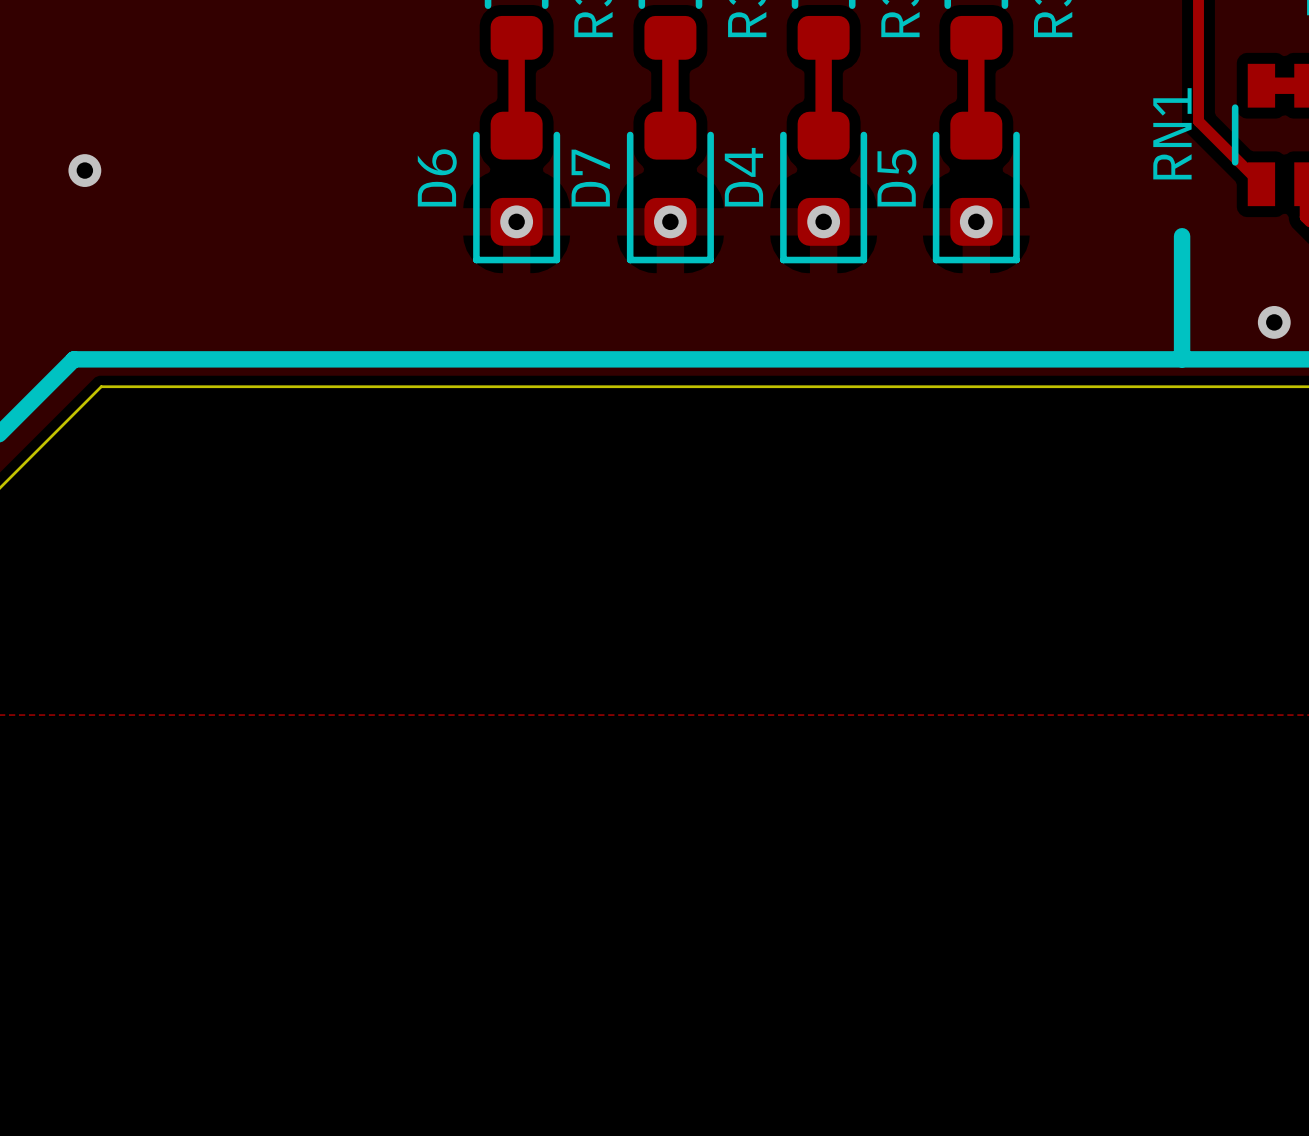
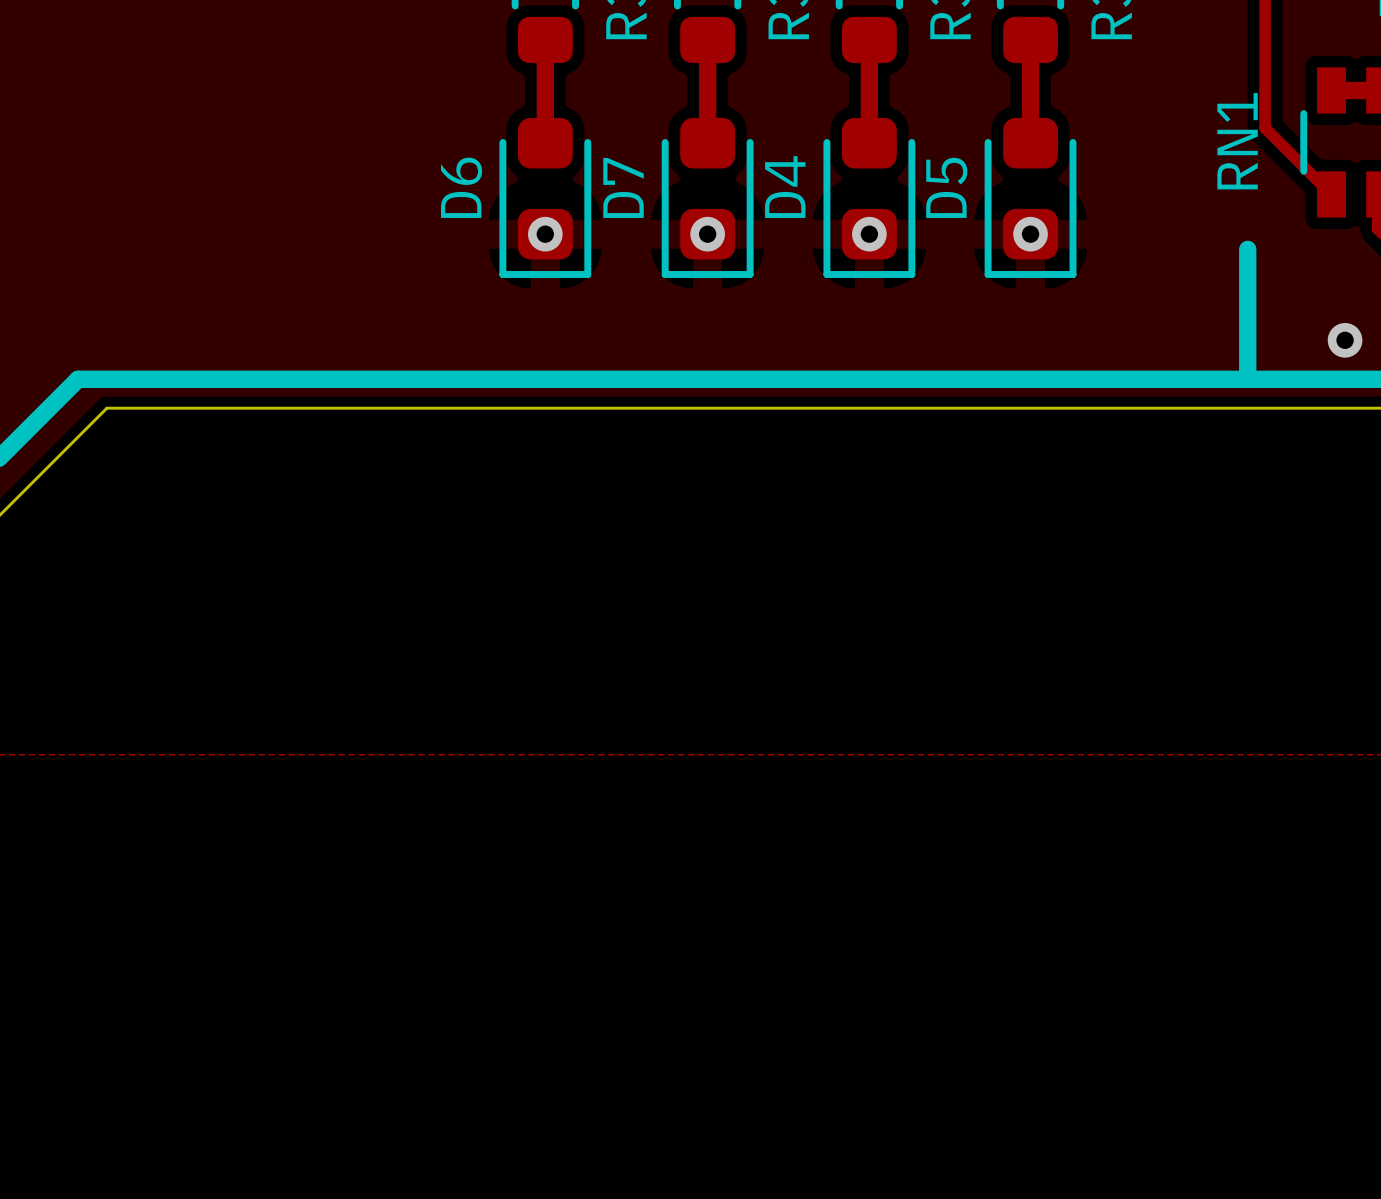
via: (84, 170) -> none

